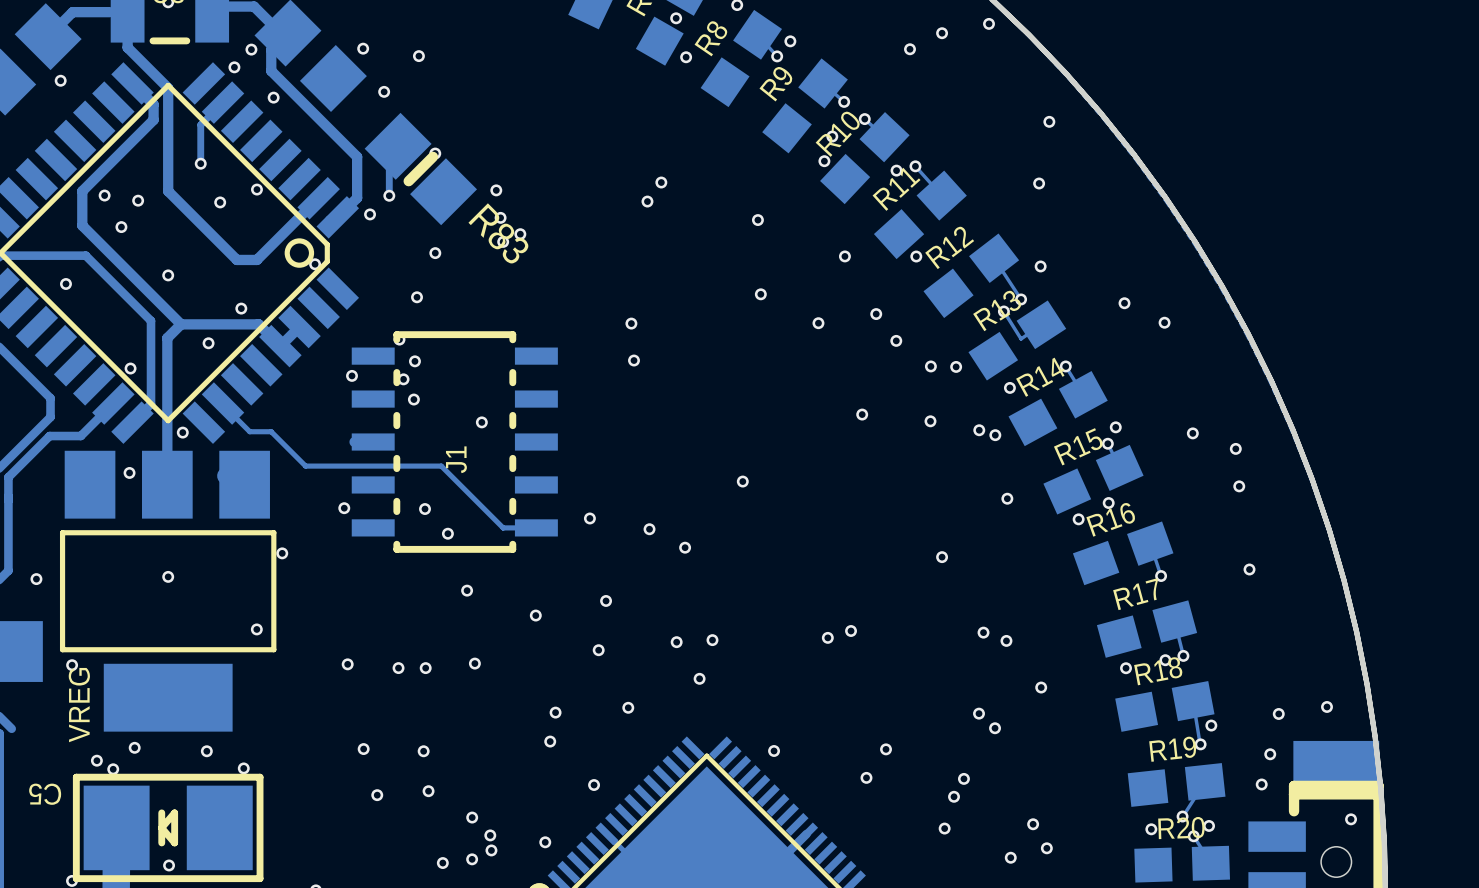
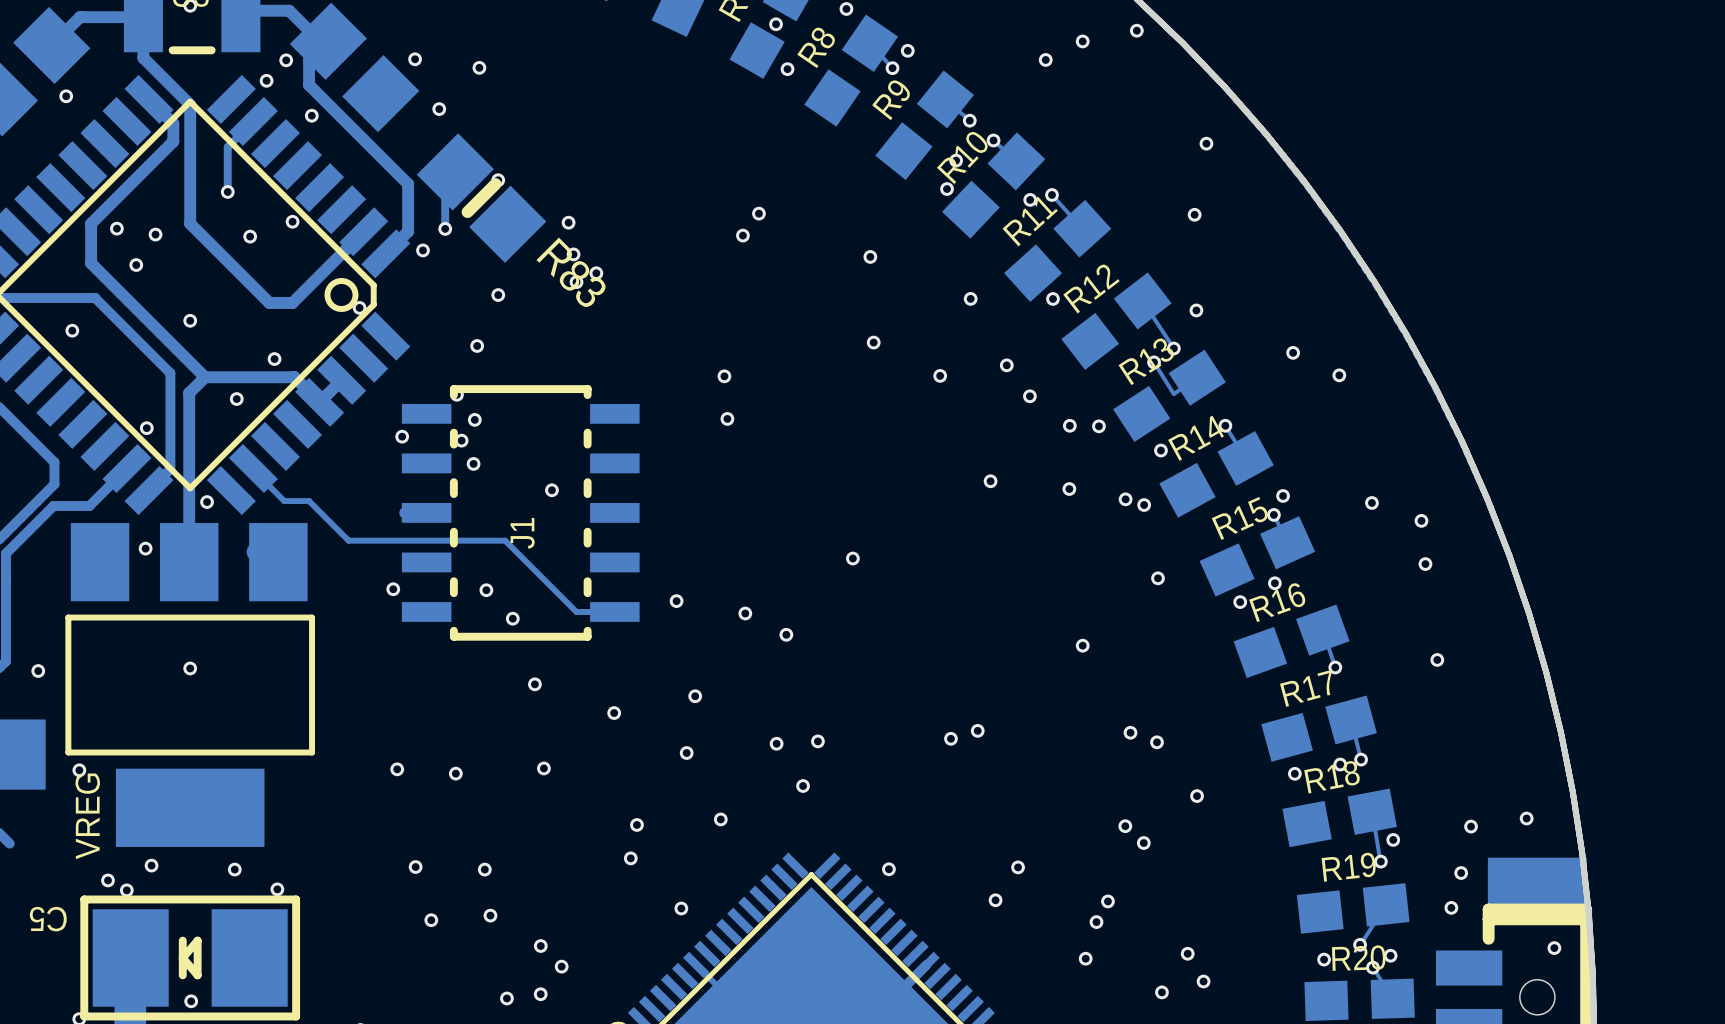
via: (282, 553) -> none
via: (256, 629) -> none
via: (425, 668) -> none
via: (545, 842) -> none
via: (491, 850) -> none

